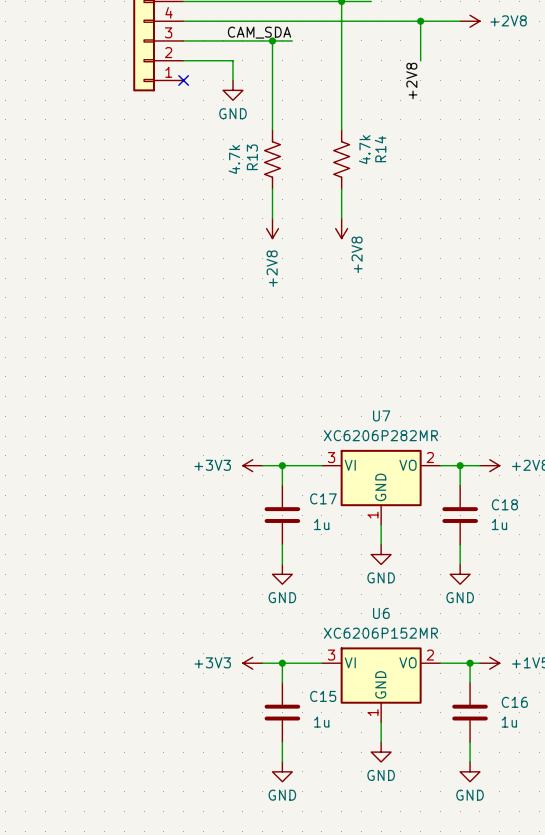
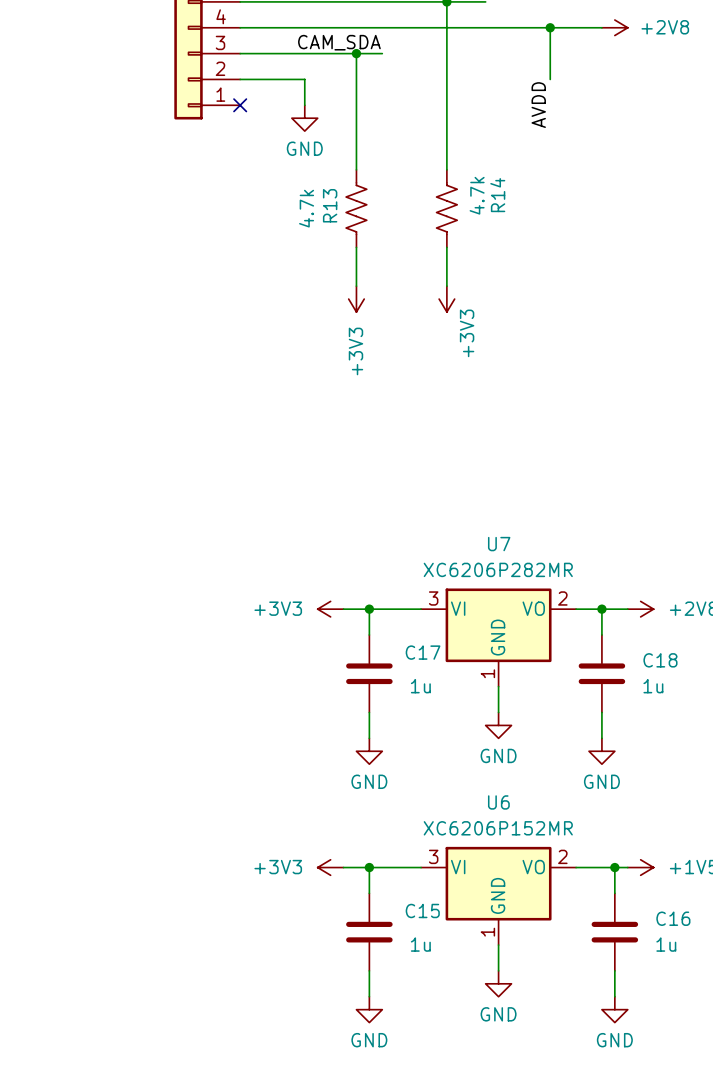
label: +2V8 (411, 81) -> AVDD (538, 105)
power symbol: +2V8 (272, 228) -> +3V3 (356, 299)
power symbol: +2V8 (341, 228) -> +3V3 (446, 299)

